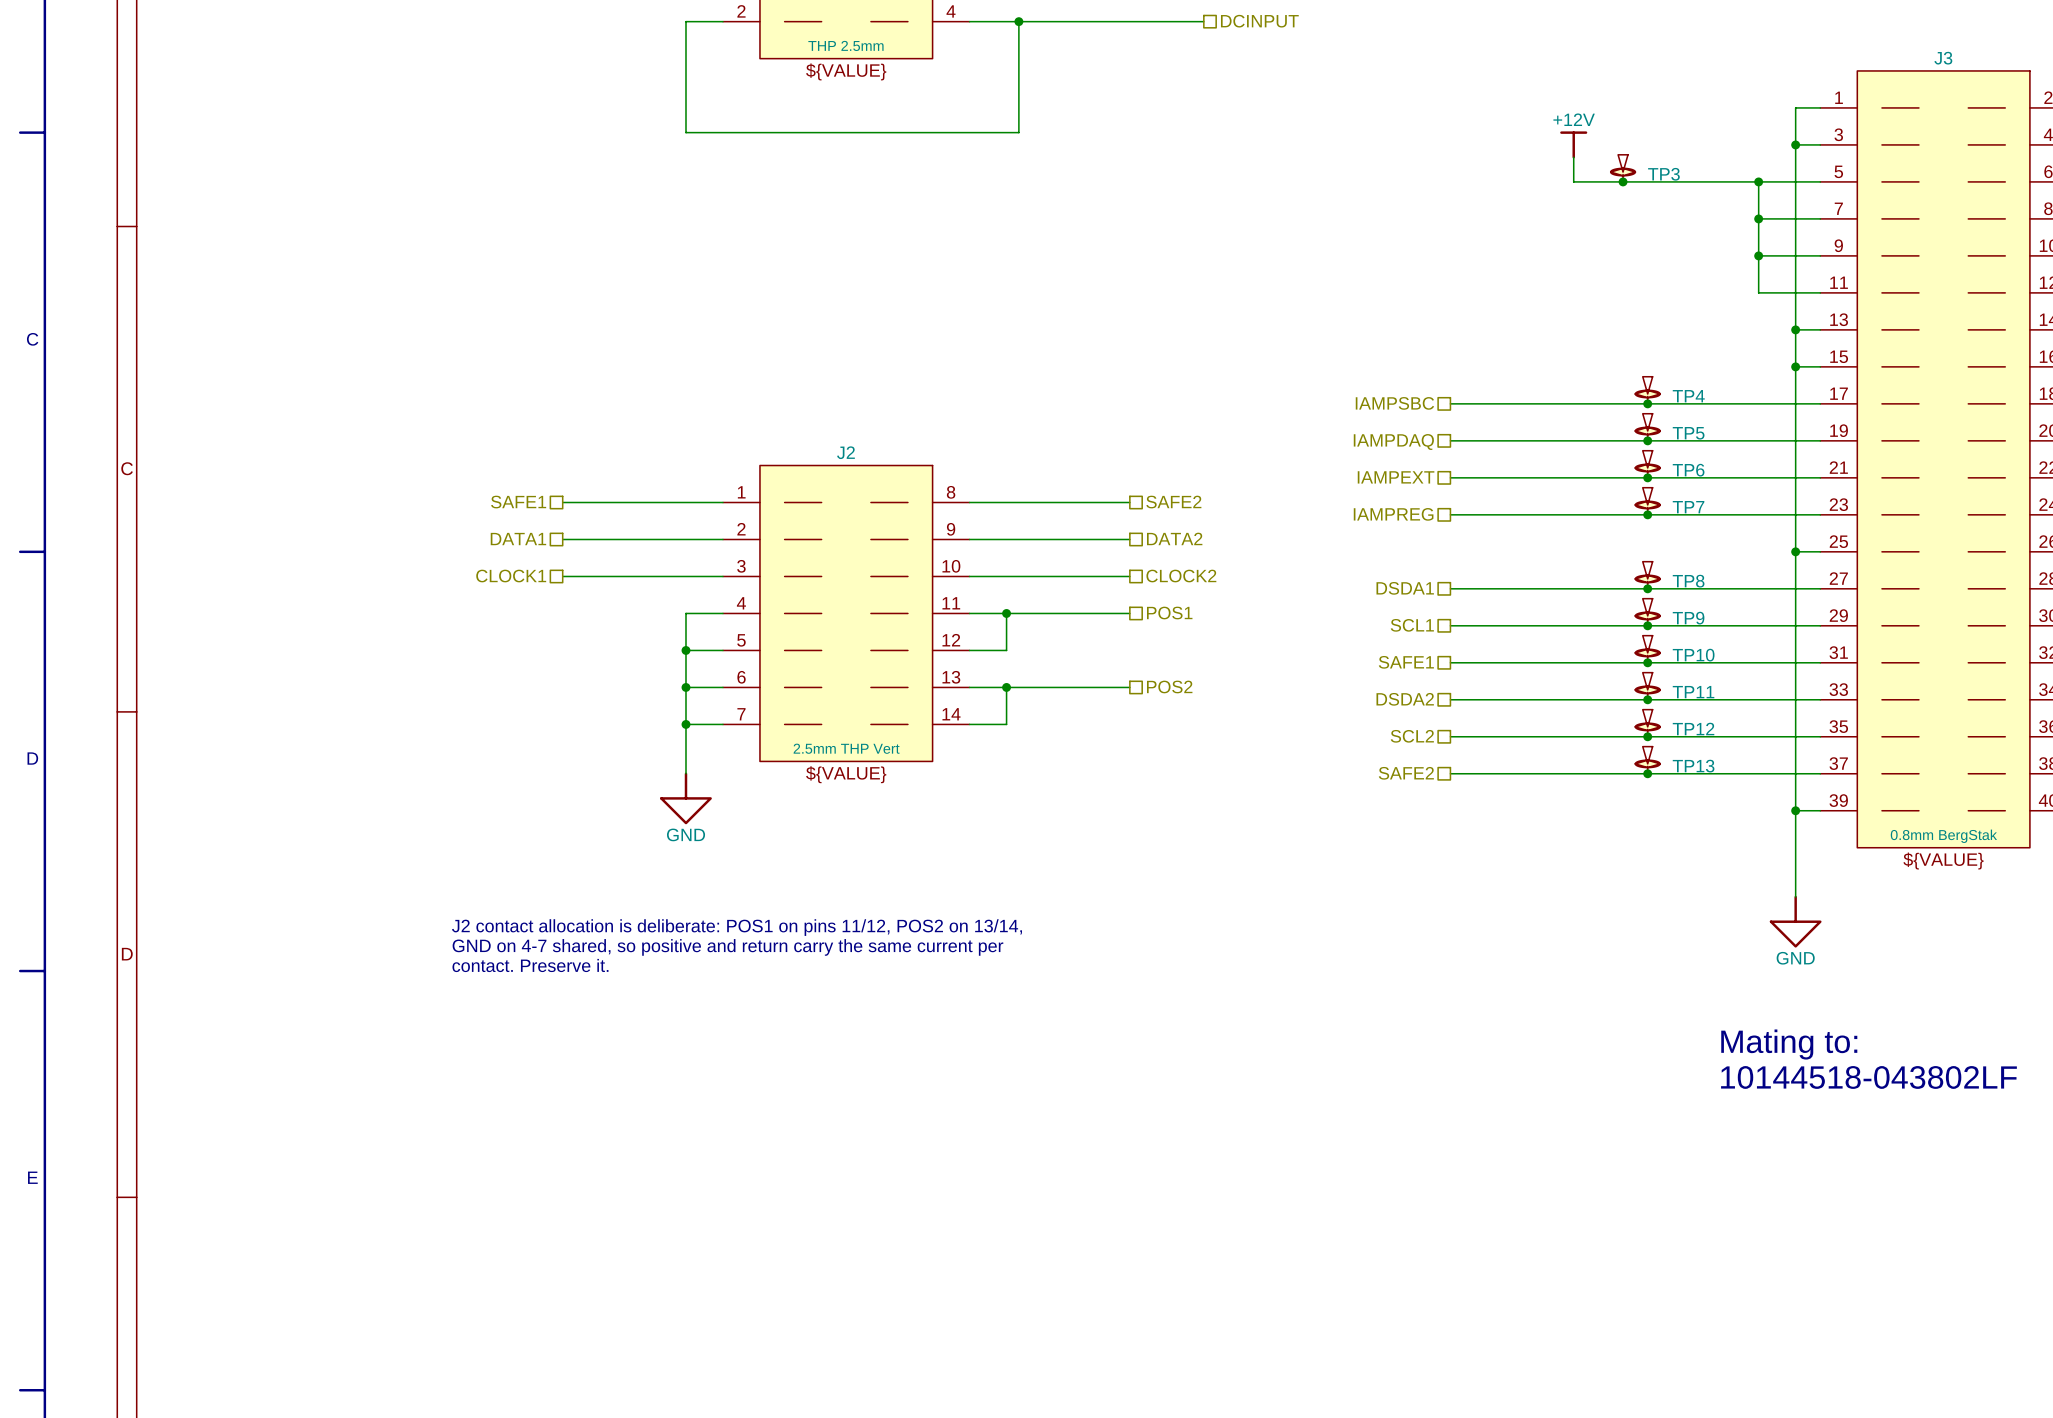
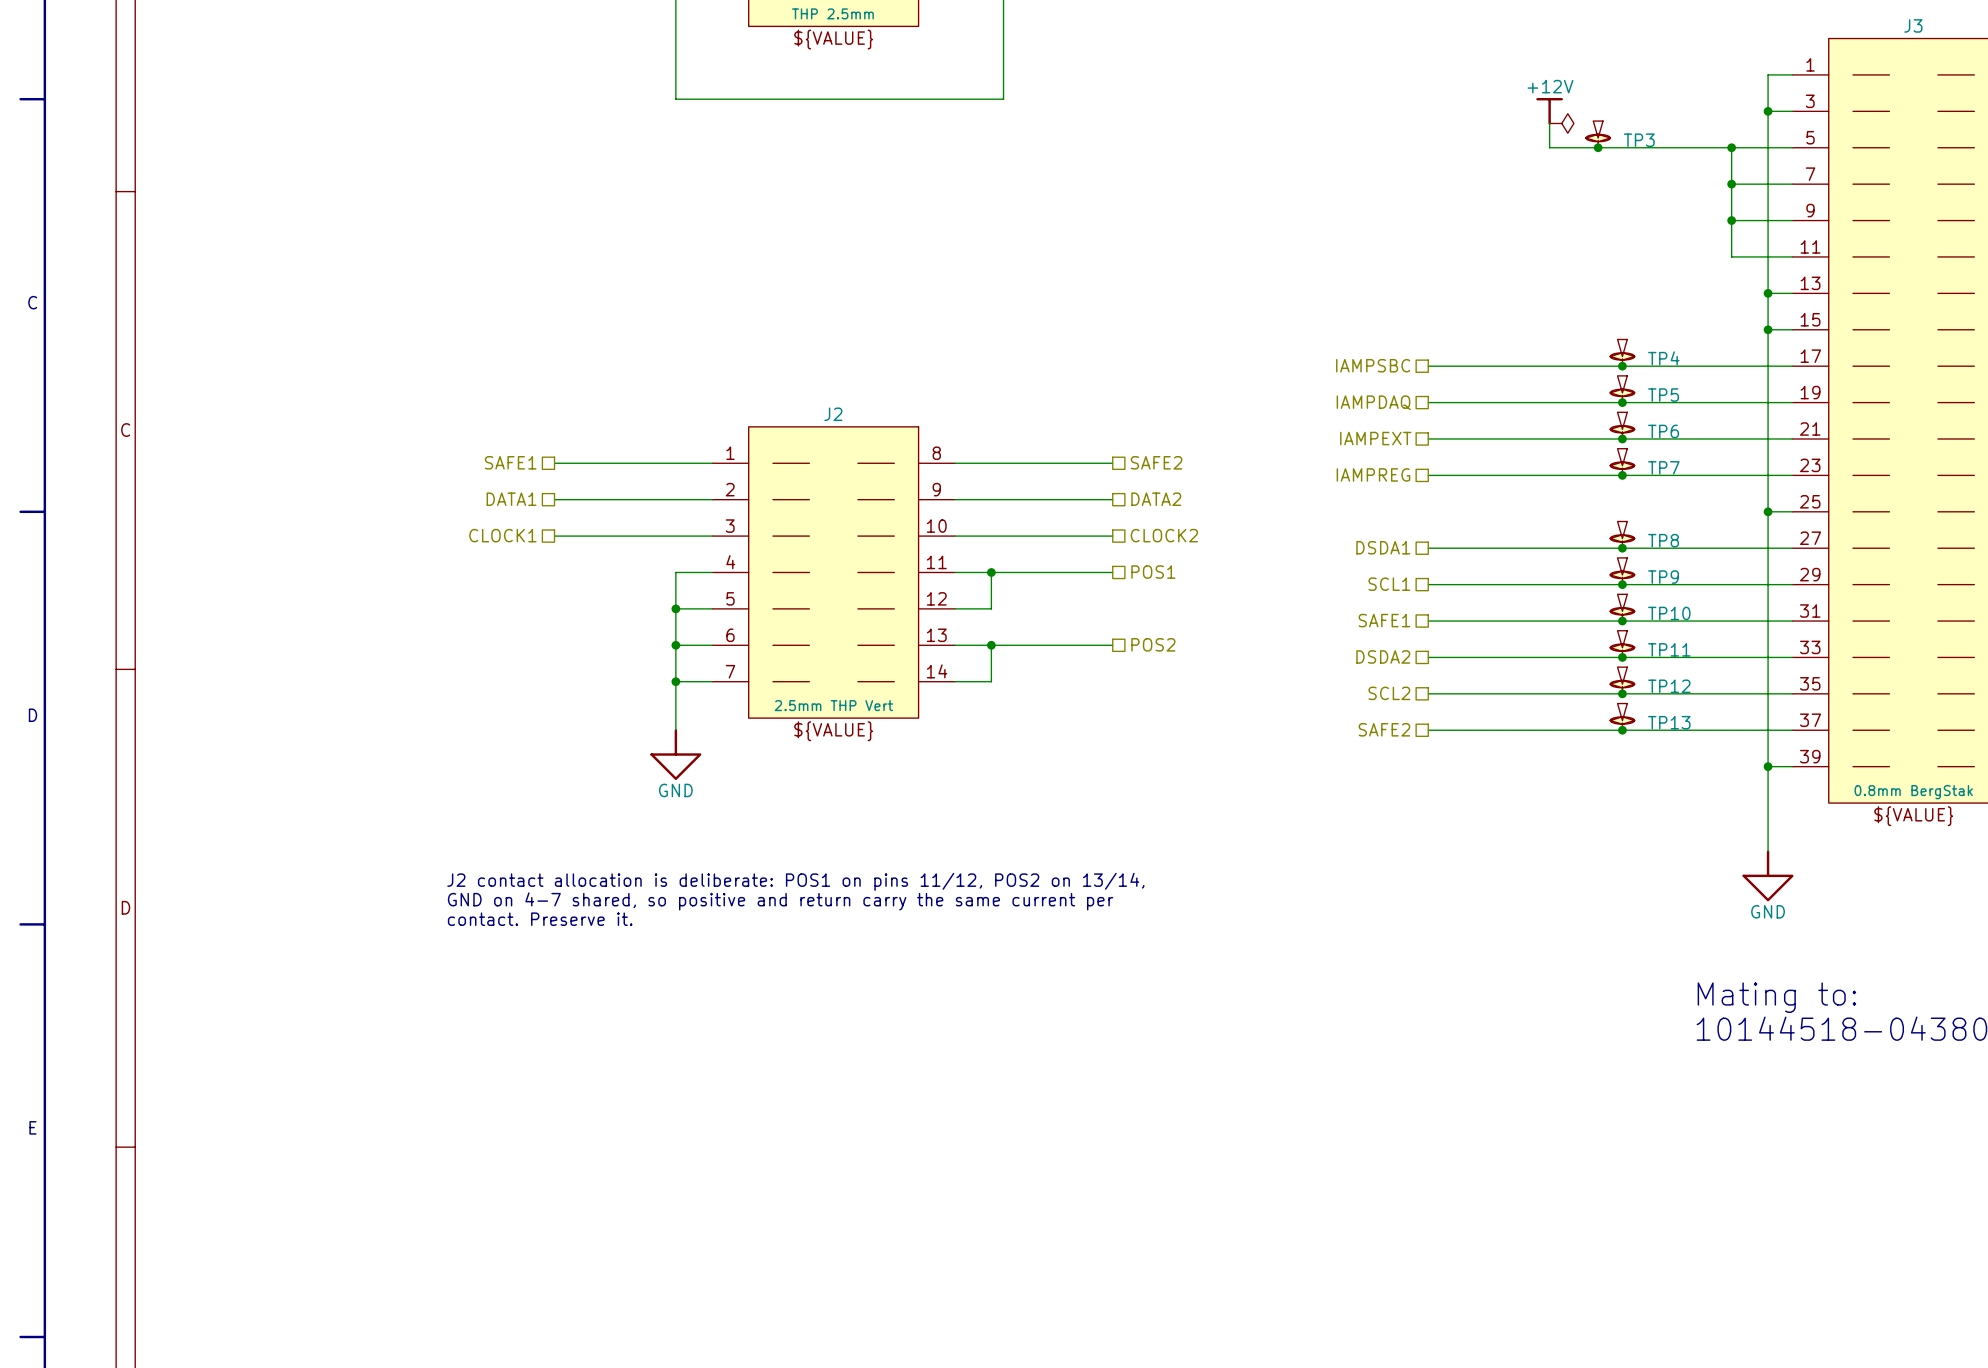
power symbol: none -> (1561, 123)

